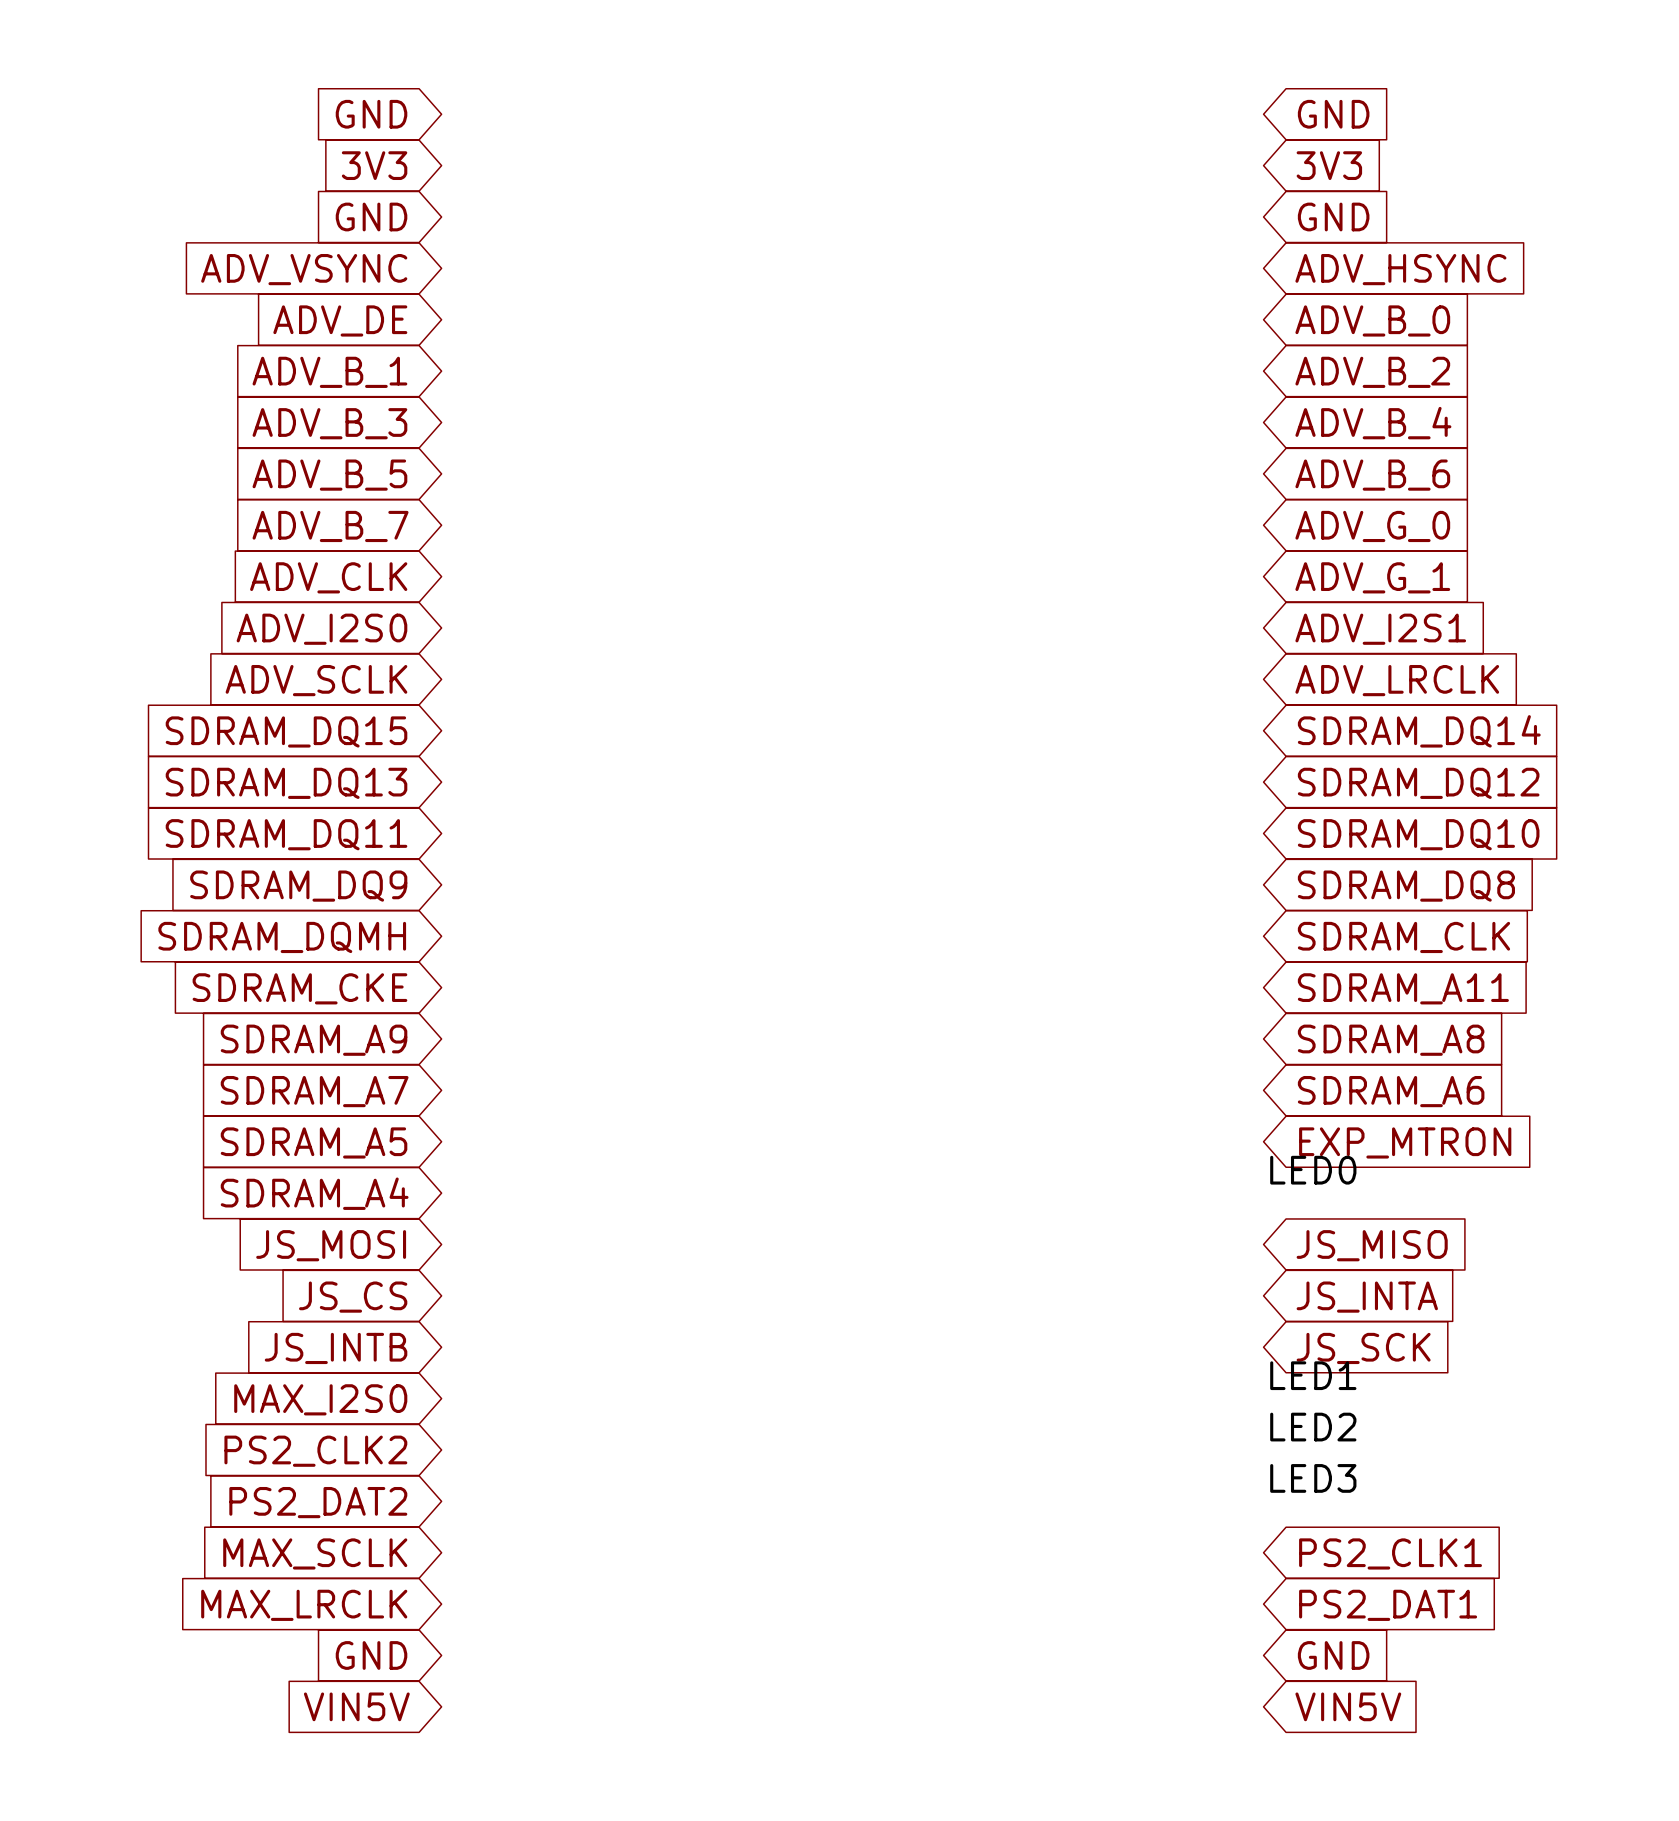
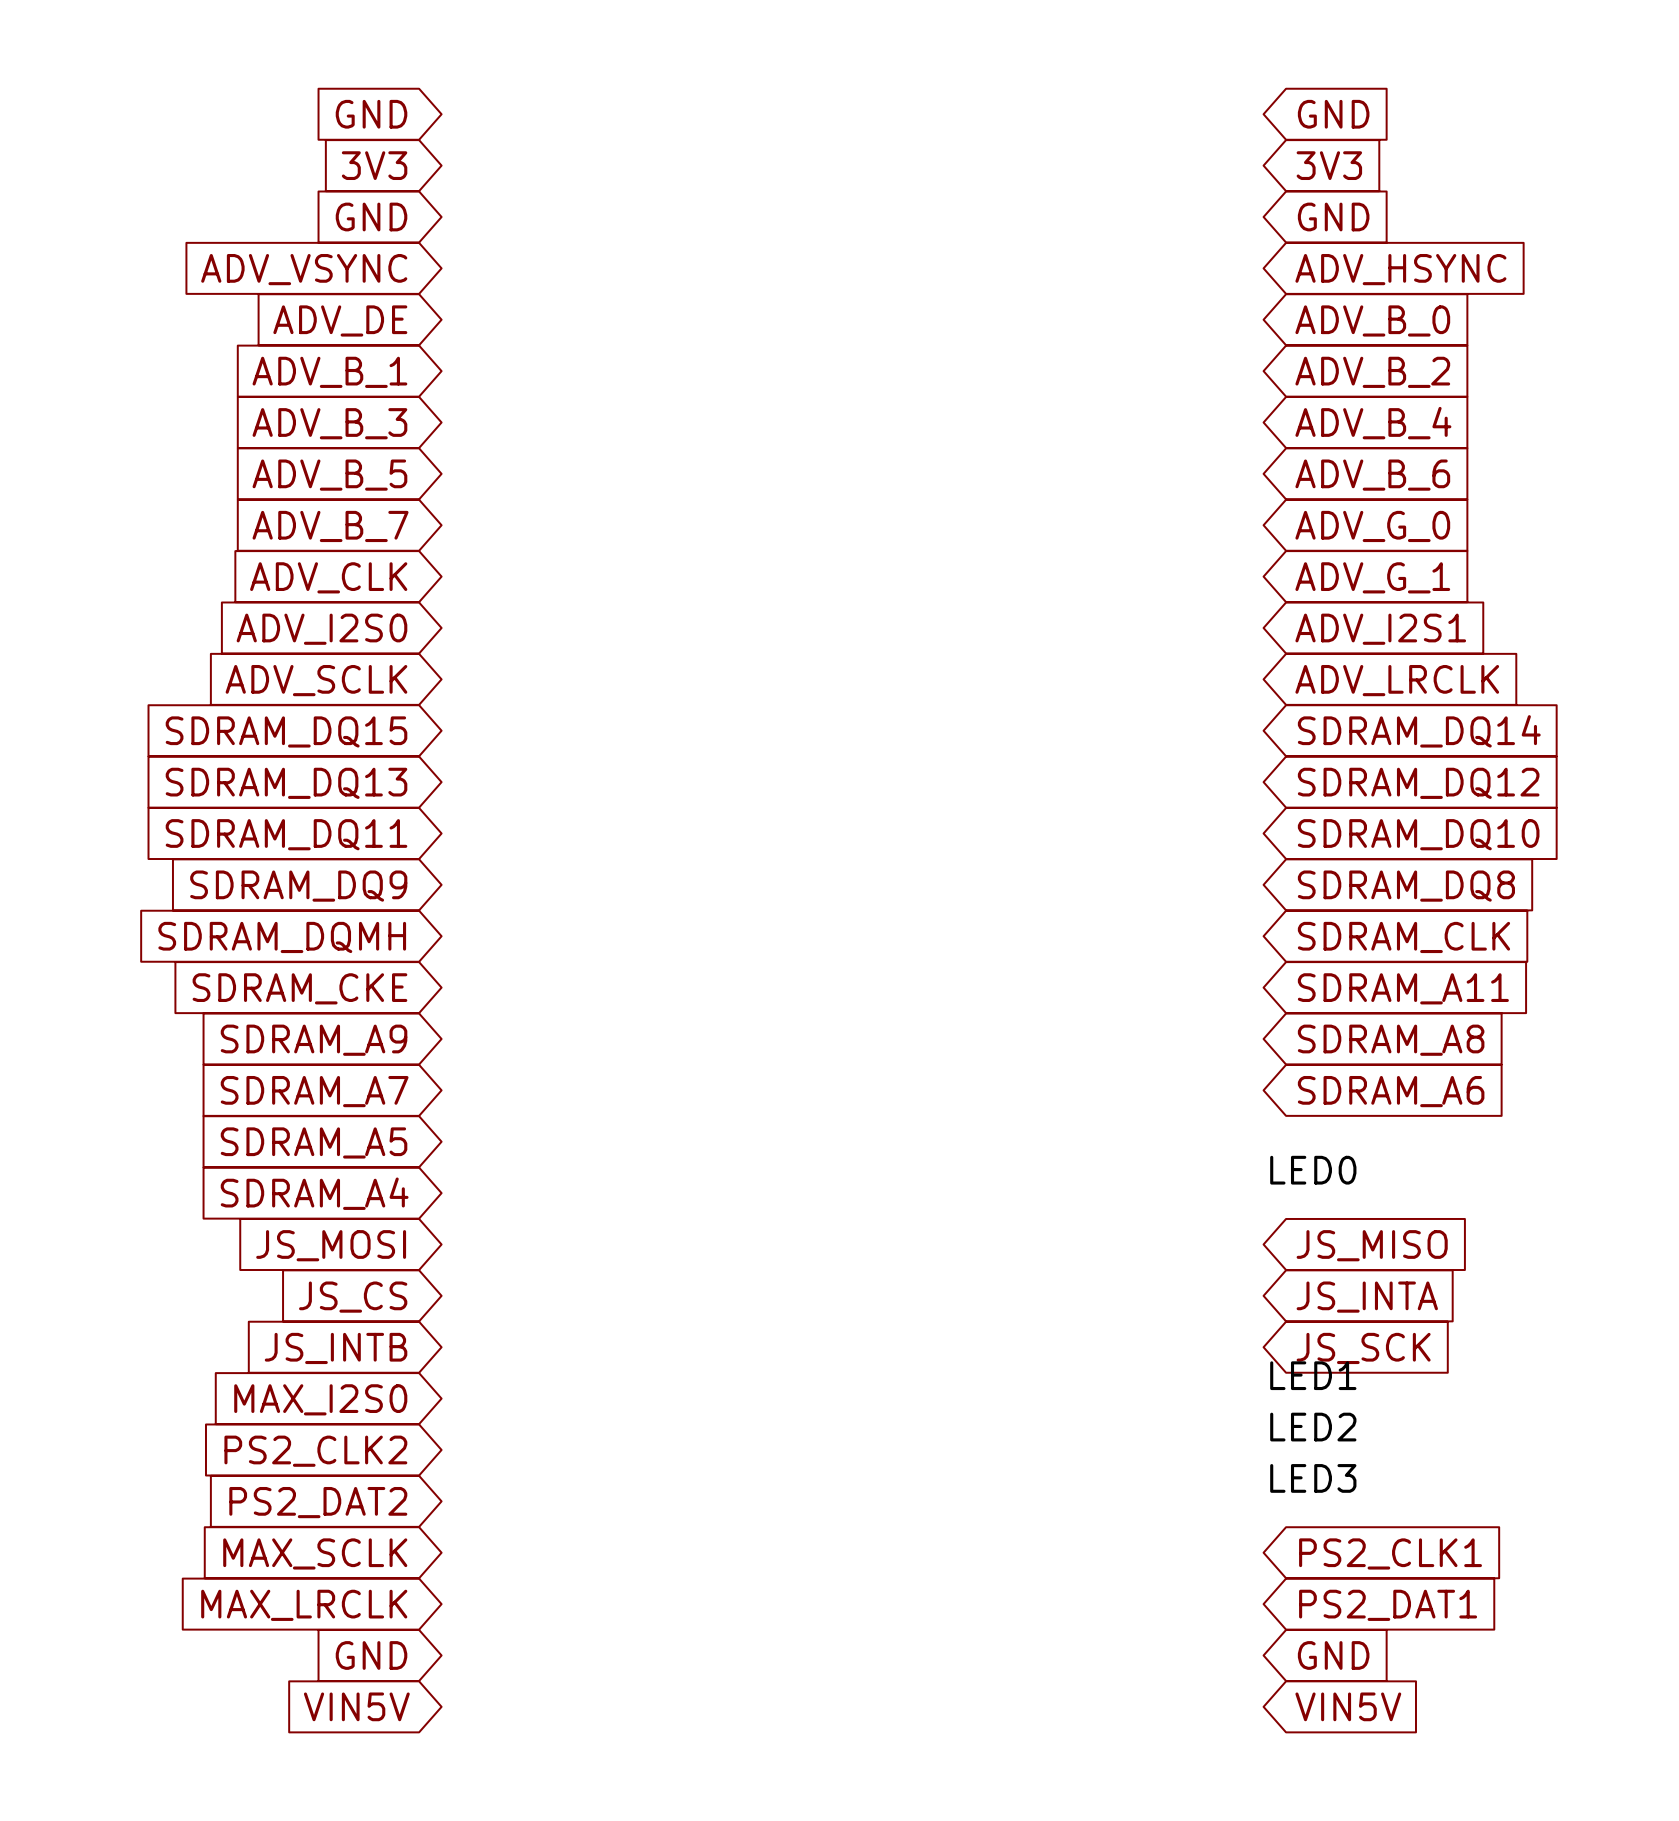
global label: EXP_MTRON (1405, 1142) -> none

